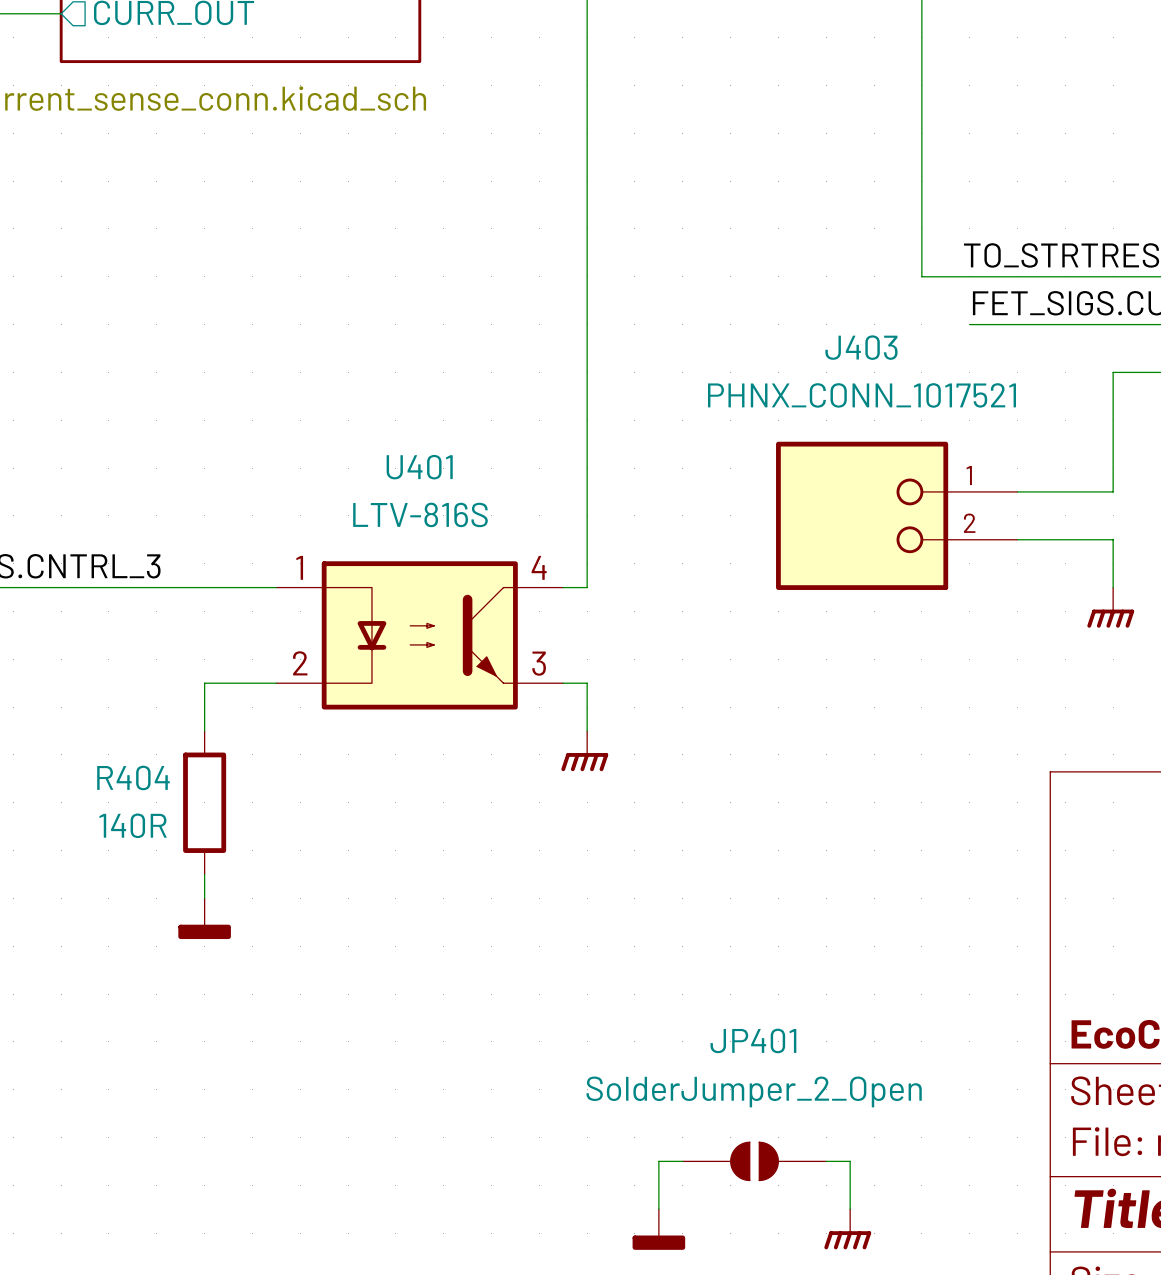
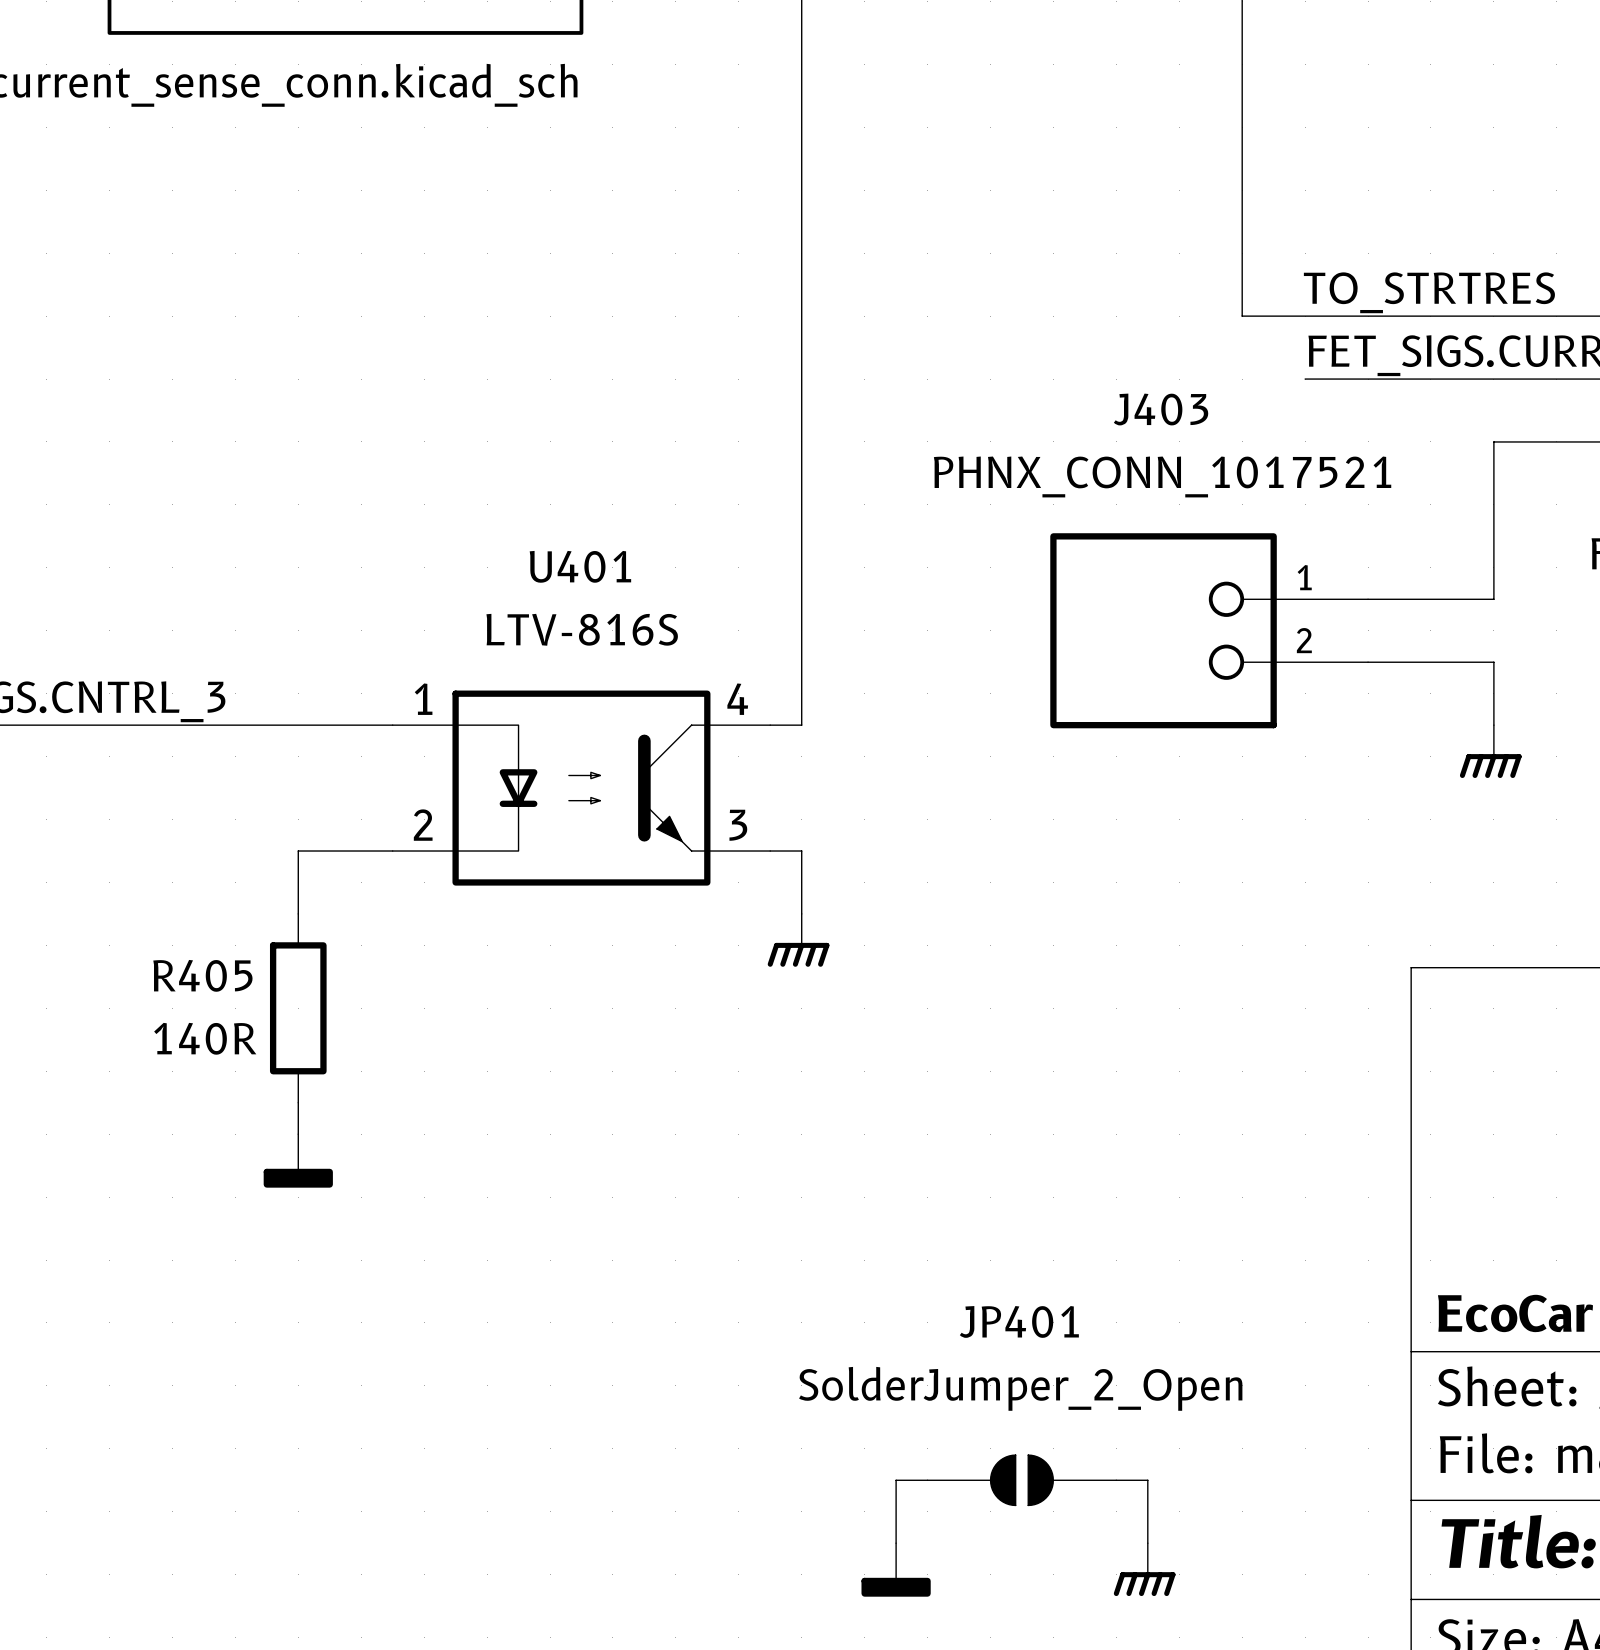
R404 name: R404 (133, 777) -> R405 (202, 975)

